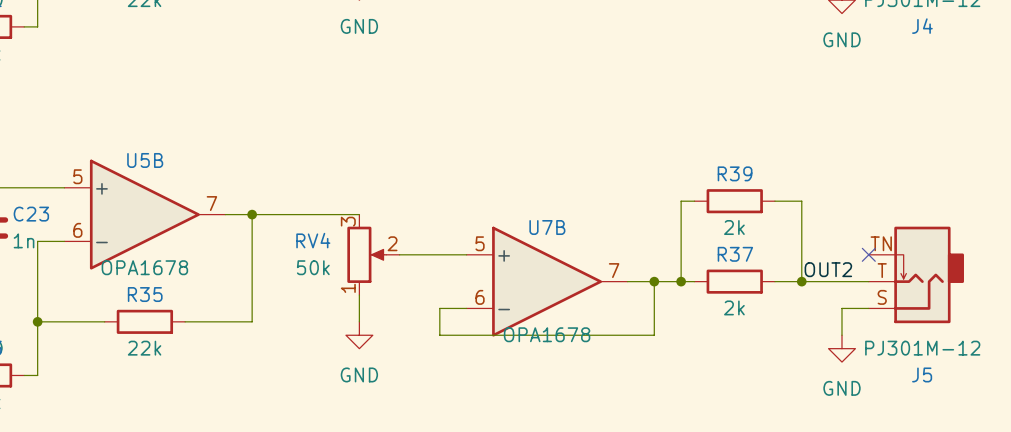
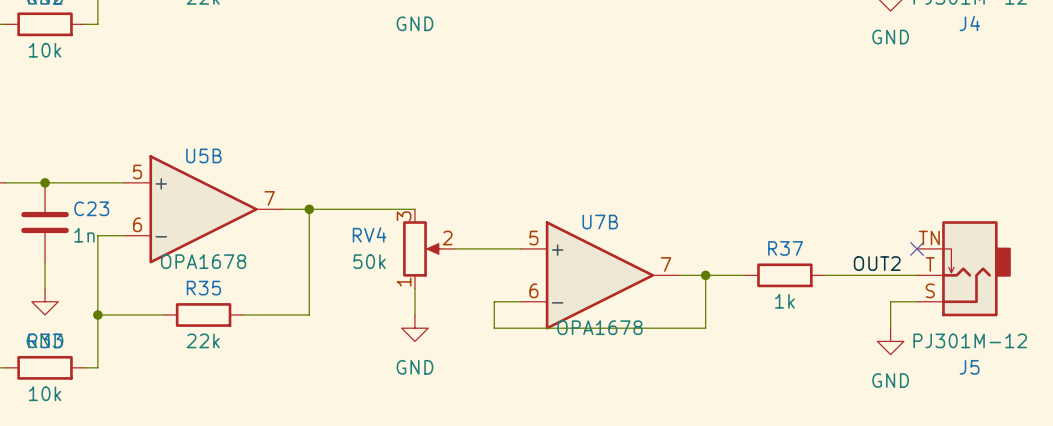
wire: (694, 201) (681, 201) (681, 281) -> none
R39: 2k (734, 201) -> none
wire: (774, 201) (801, 201) (801, 281) -> none
junction: (681, 281) -> none
junction: (801, 281) -> none
R37 value: 2k (734, 307) -> 1k (784, 301)

